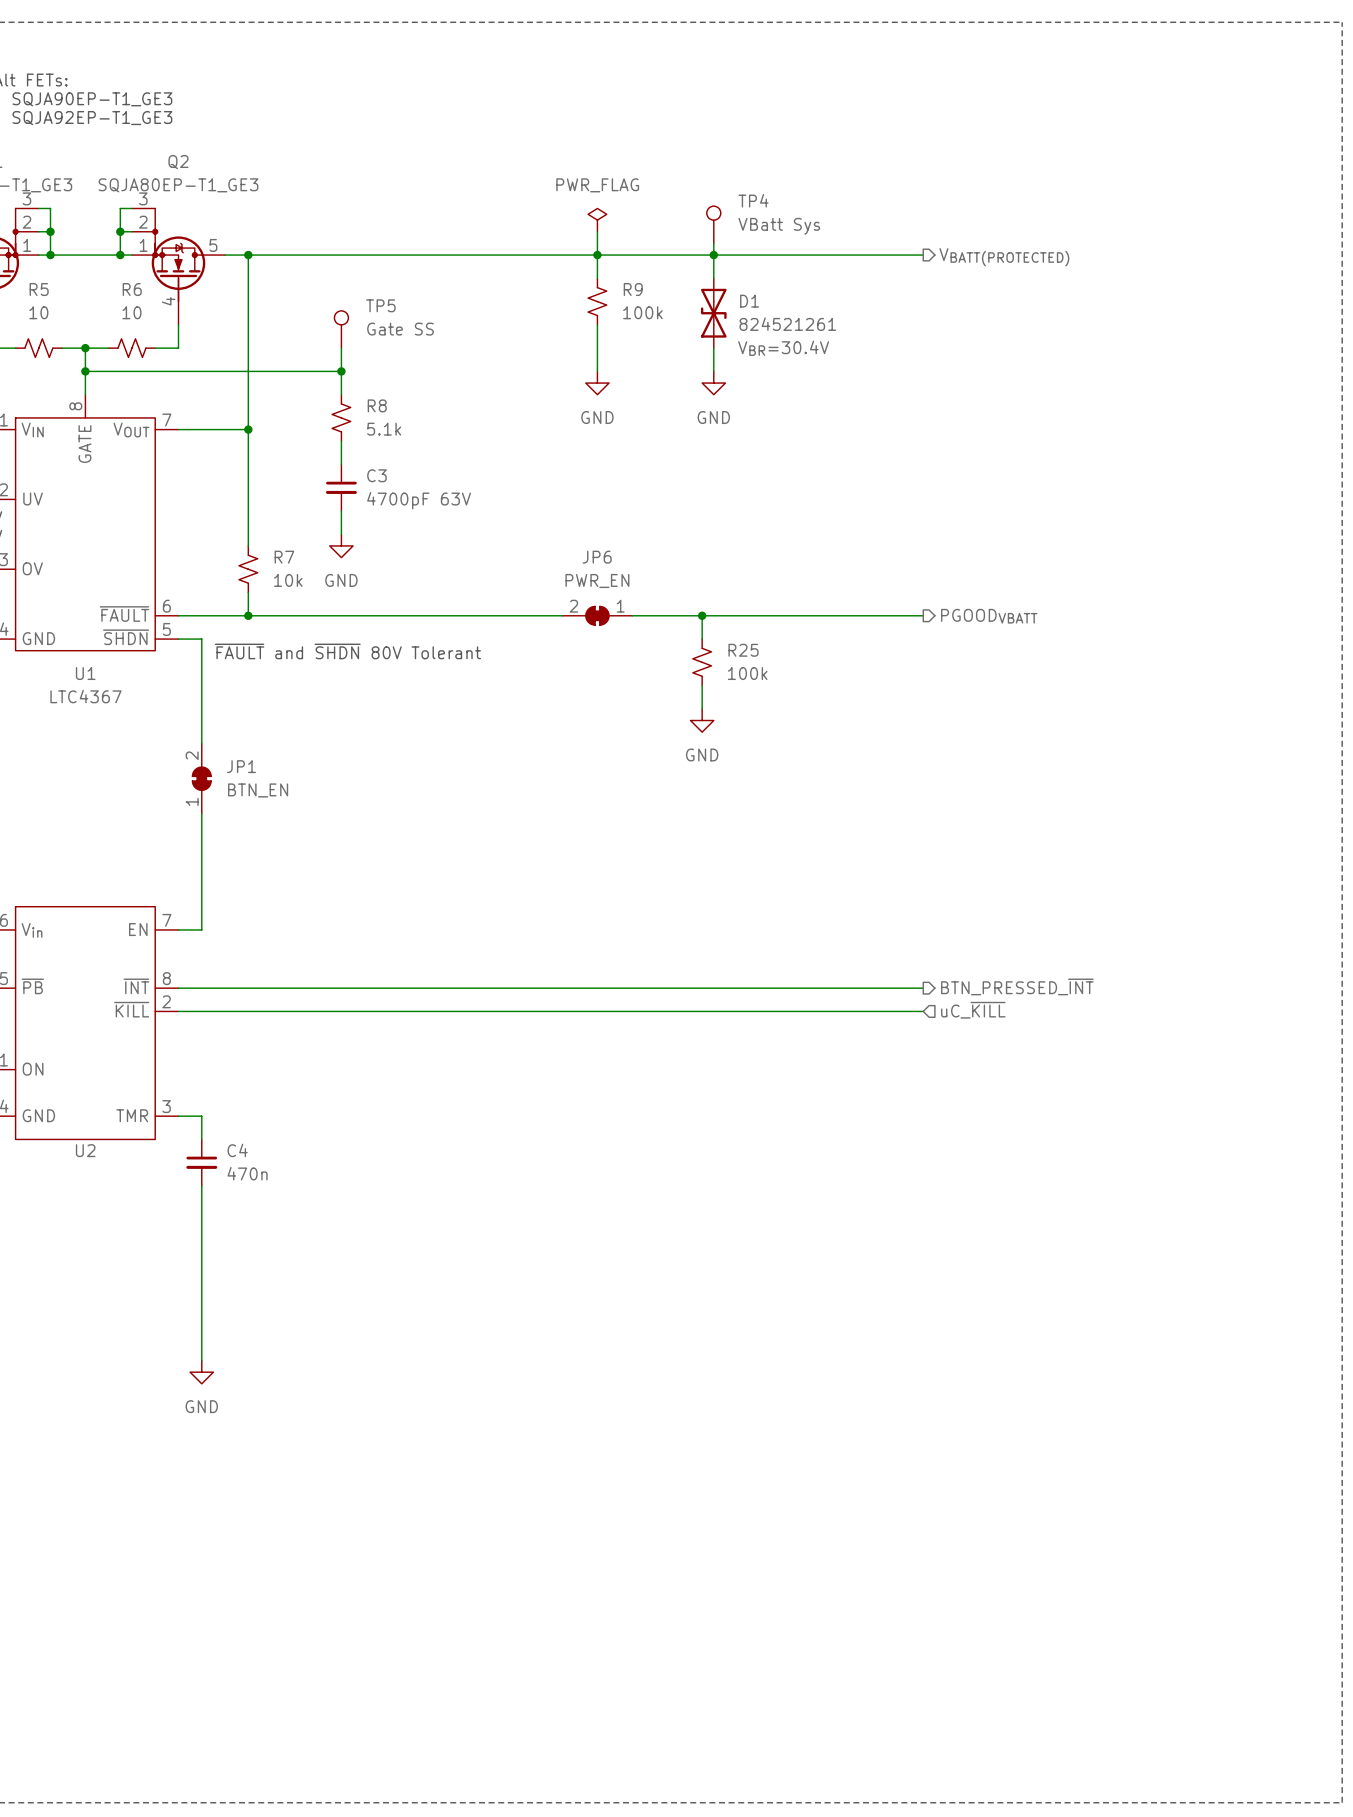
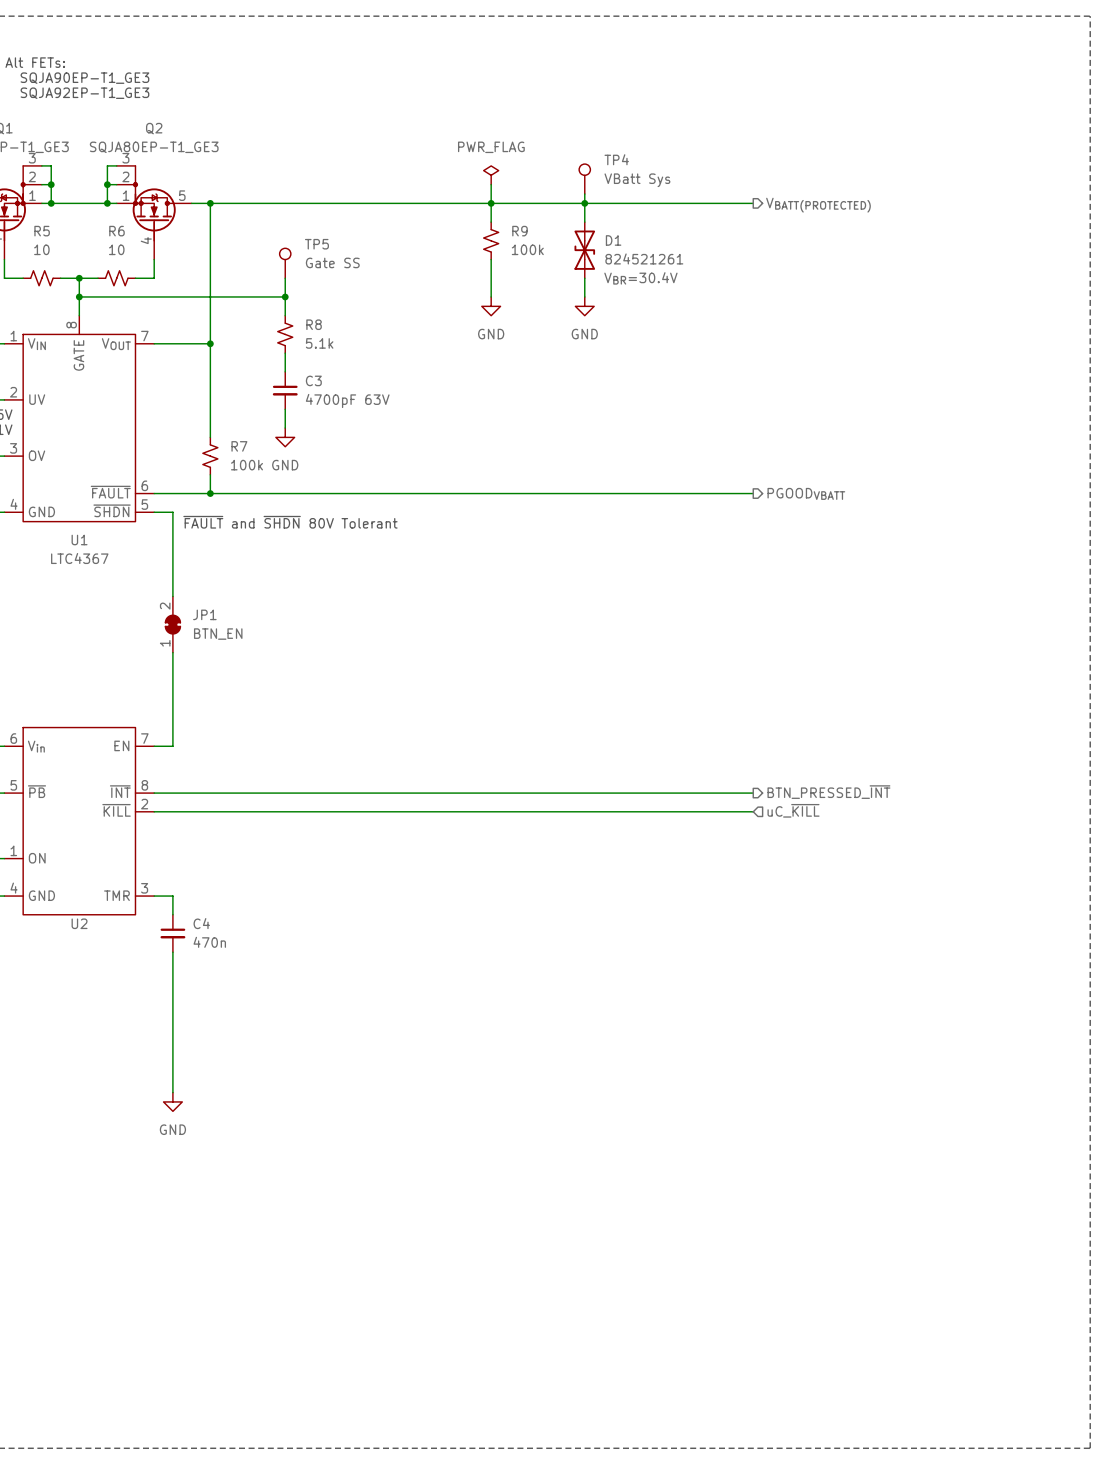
R7 value: 10k (288, 580) -> 100k (246, 465)
JP6: PWR_EN (597, 615) -> none
wire: (702, 615) (702, 639) -> none
junction: (702, 615) -> none
R25: 100k (702, 662) -> none
wire: (702, 685) (702, 708) -> none
power symbol: GND (702, 720) -> none

